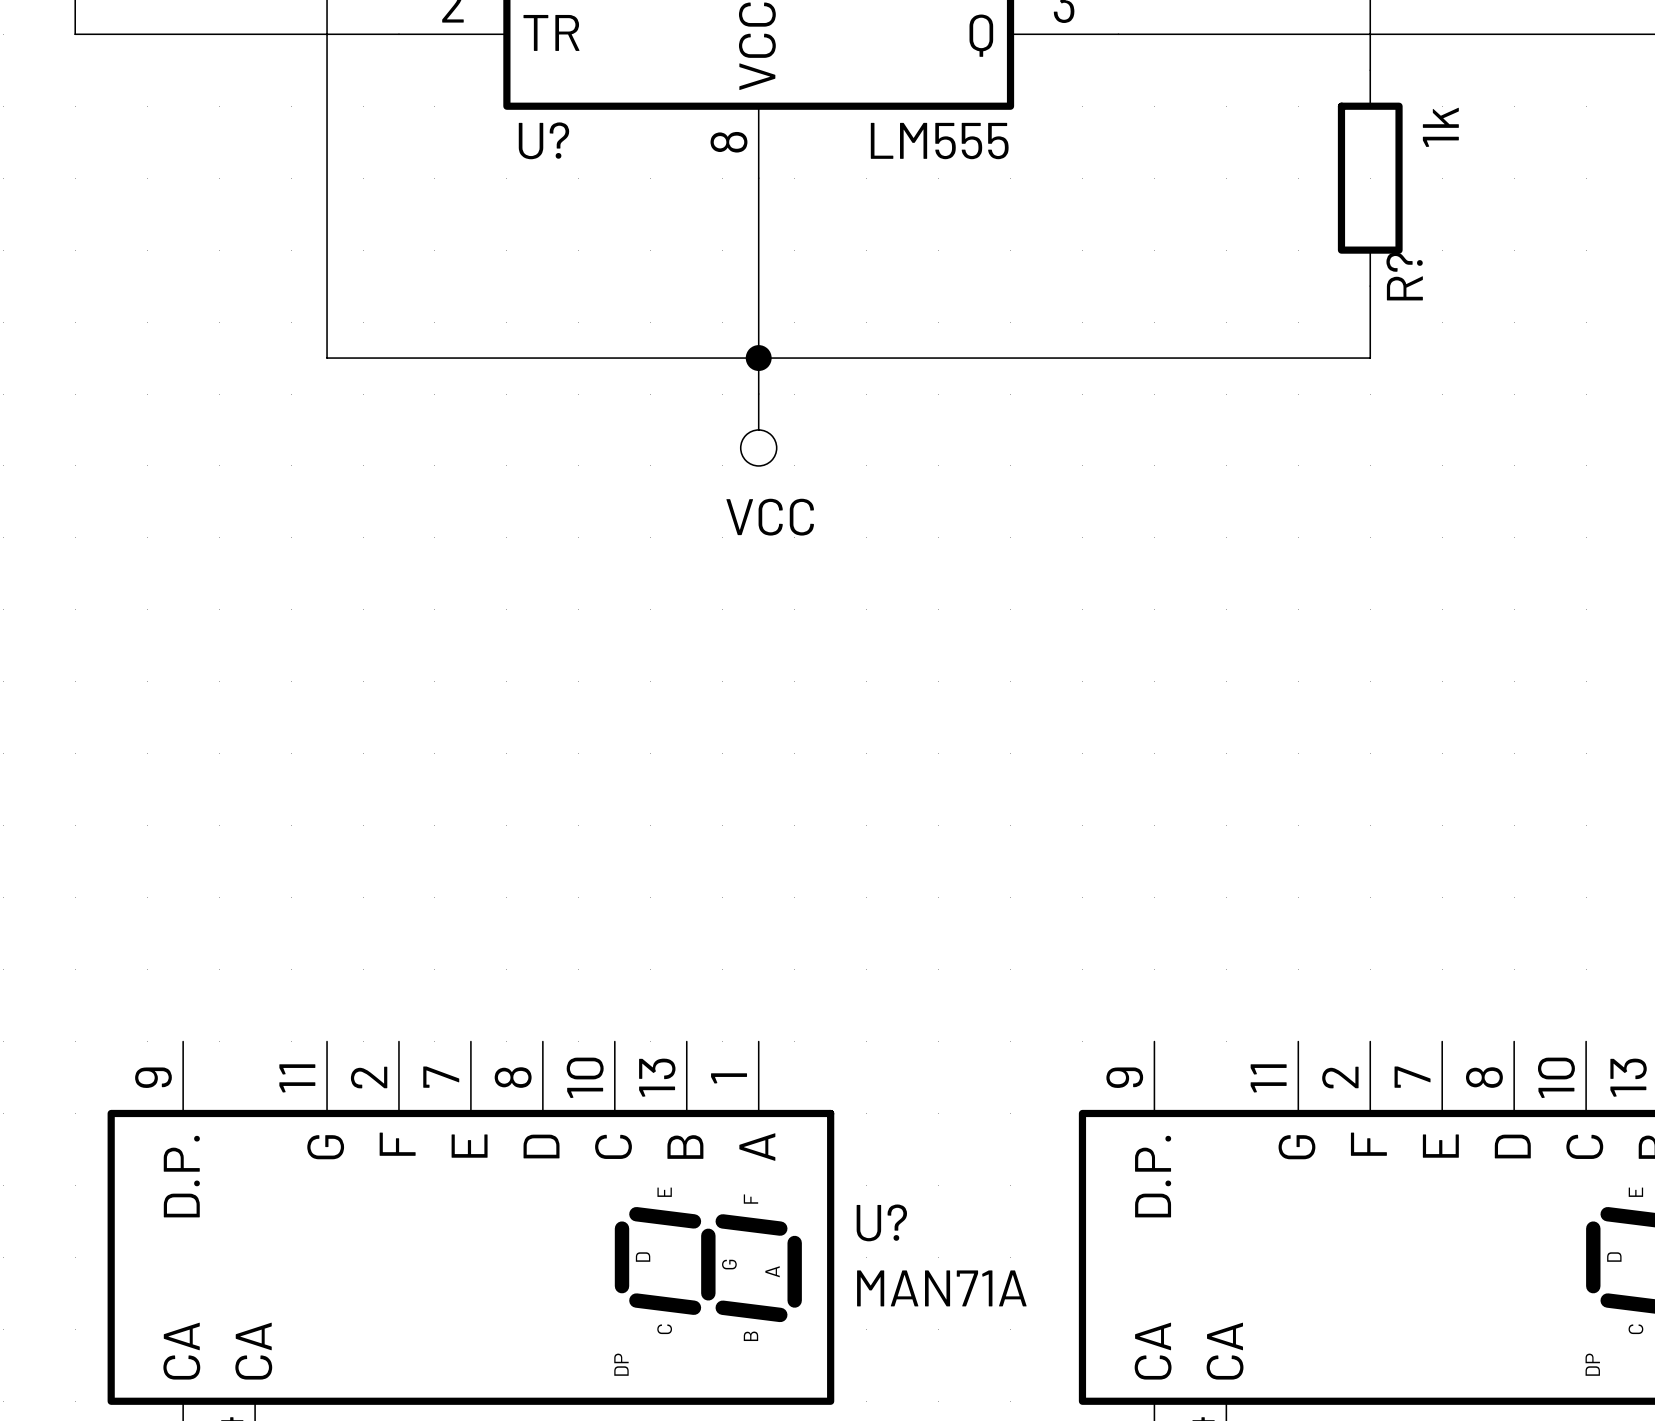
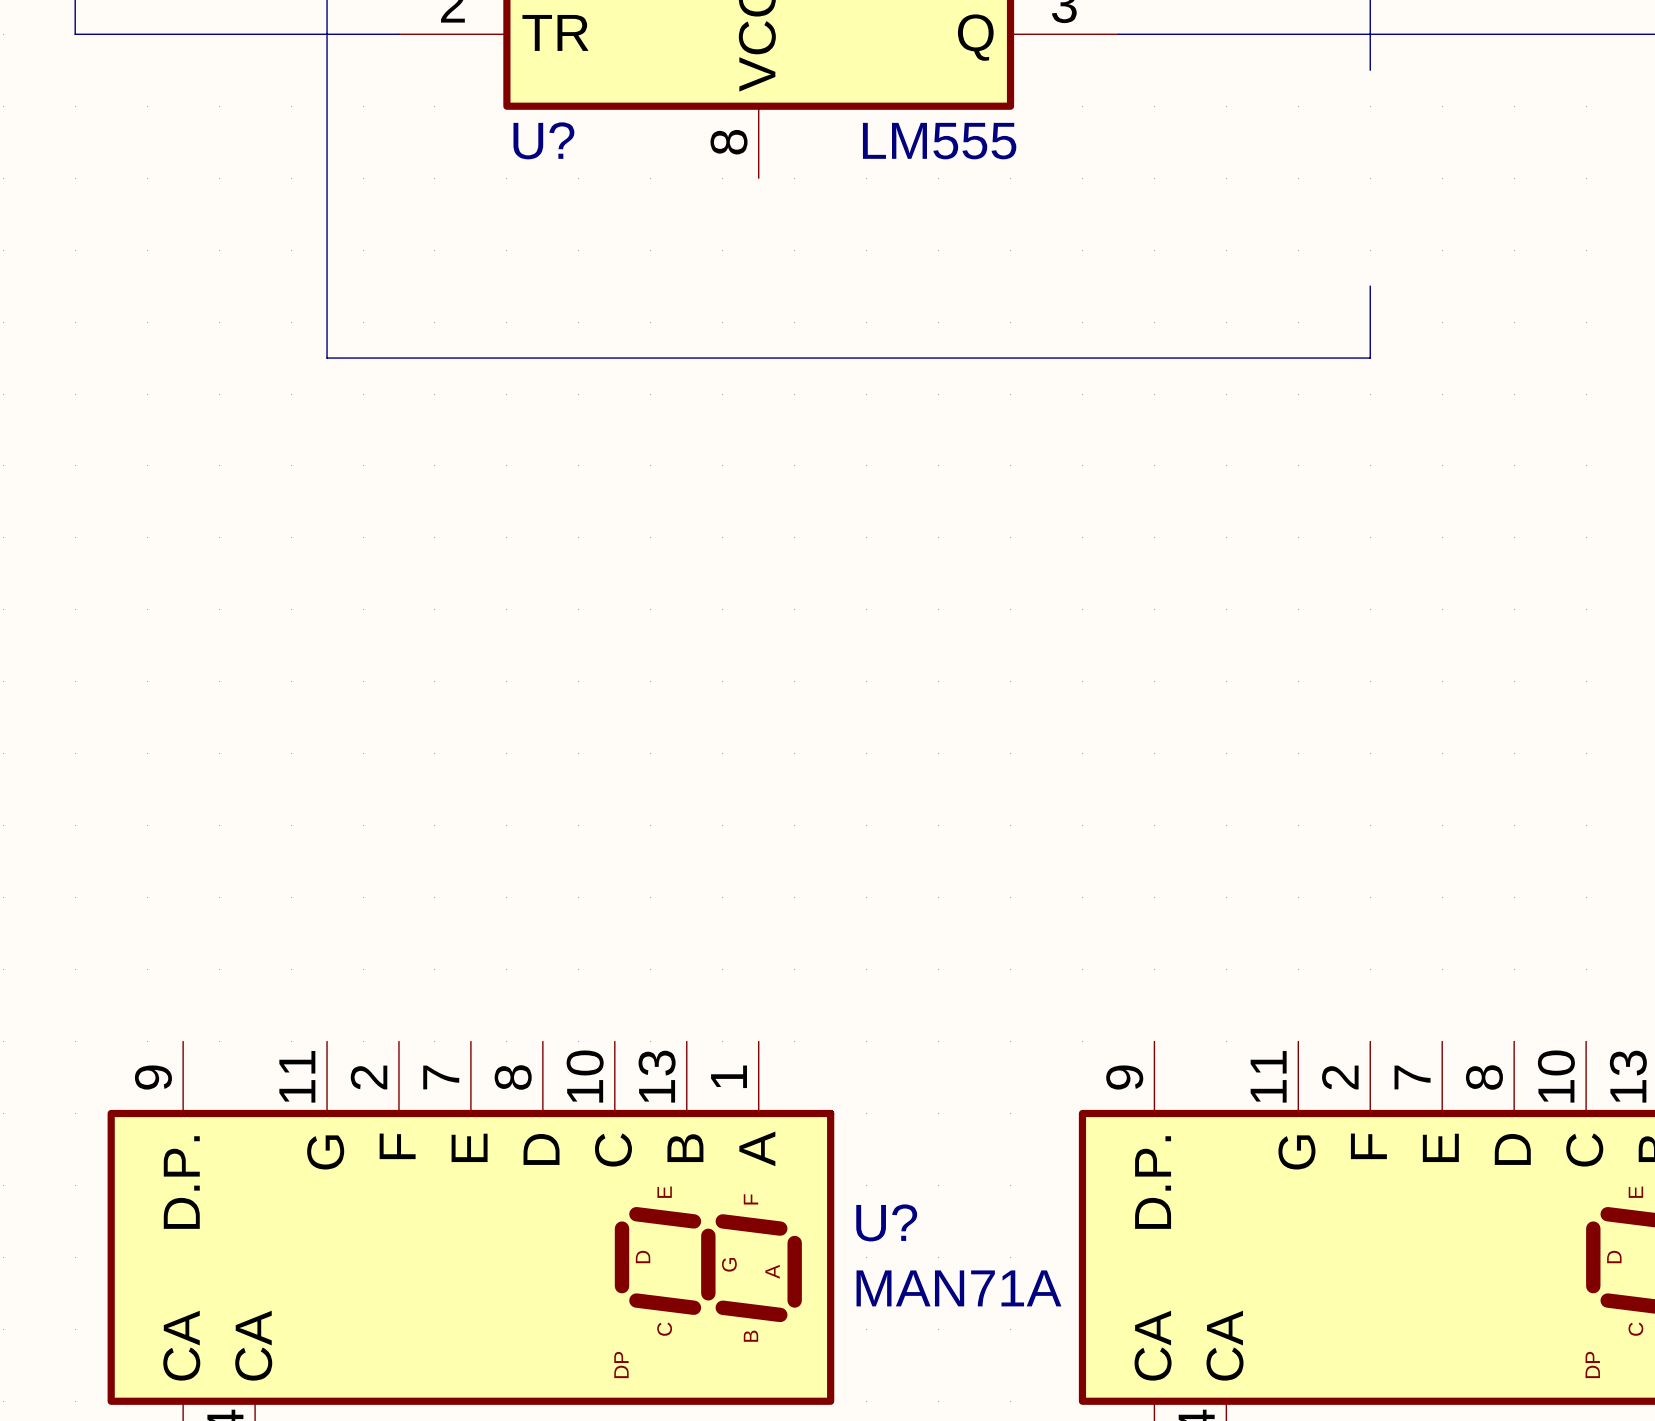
wire: (758, 178) (758, 394) -> none
R?: 1k (1370, 178) -> none
junction: (758, 358) -> none
power symbol: VCC (758, 429) -> none

